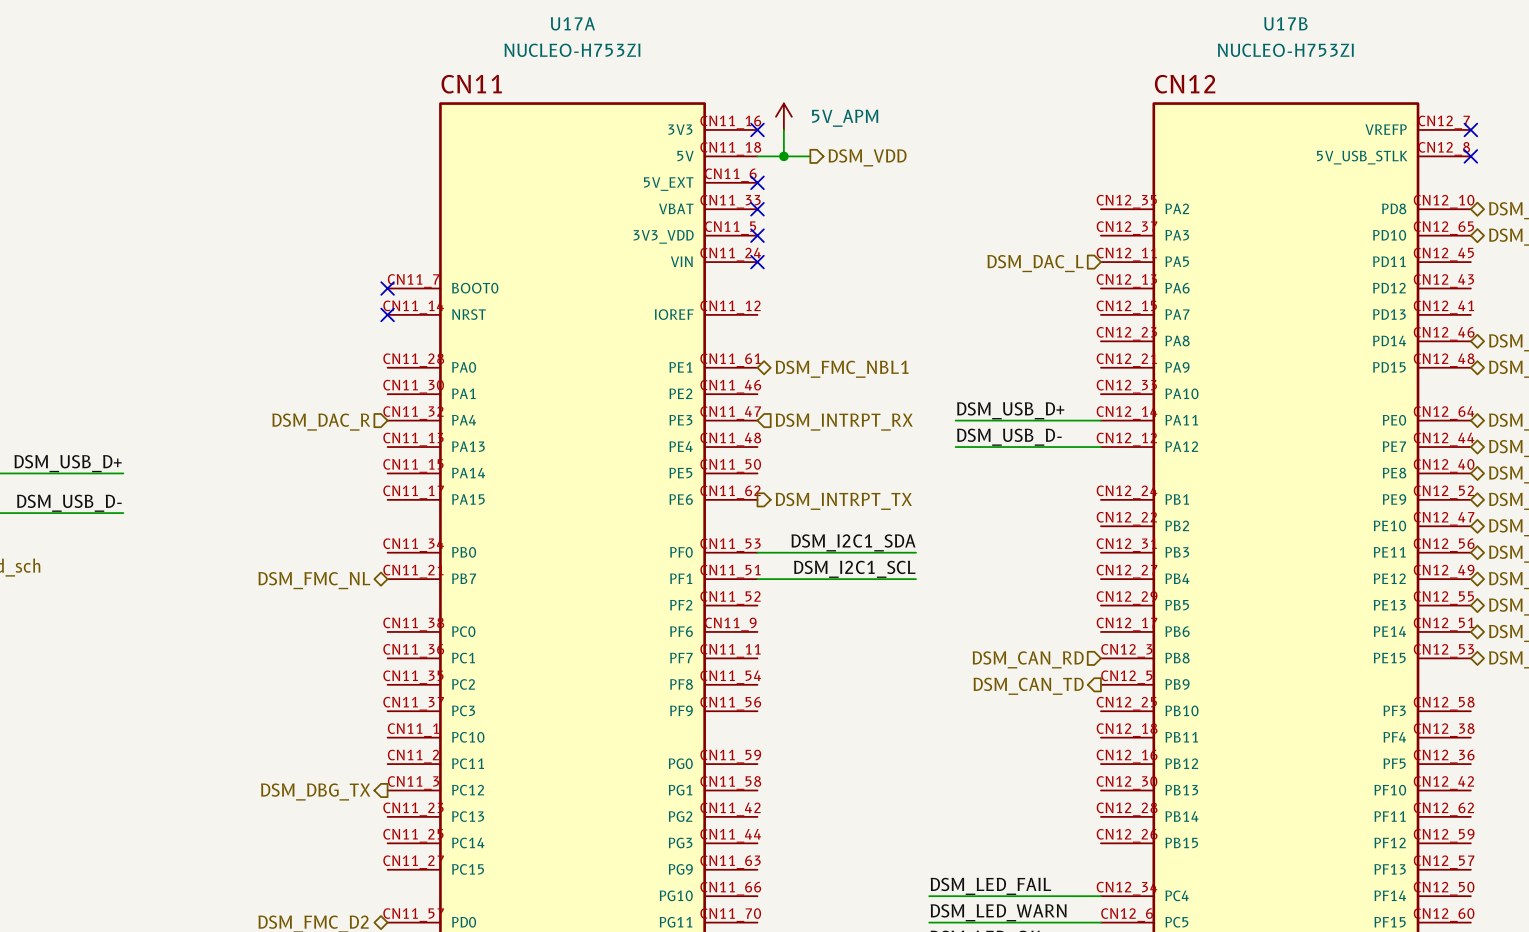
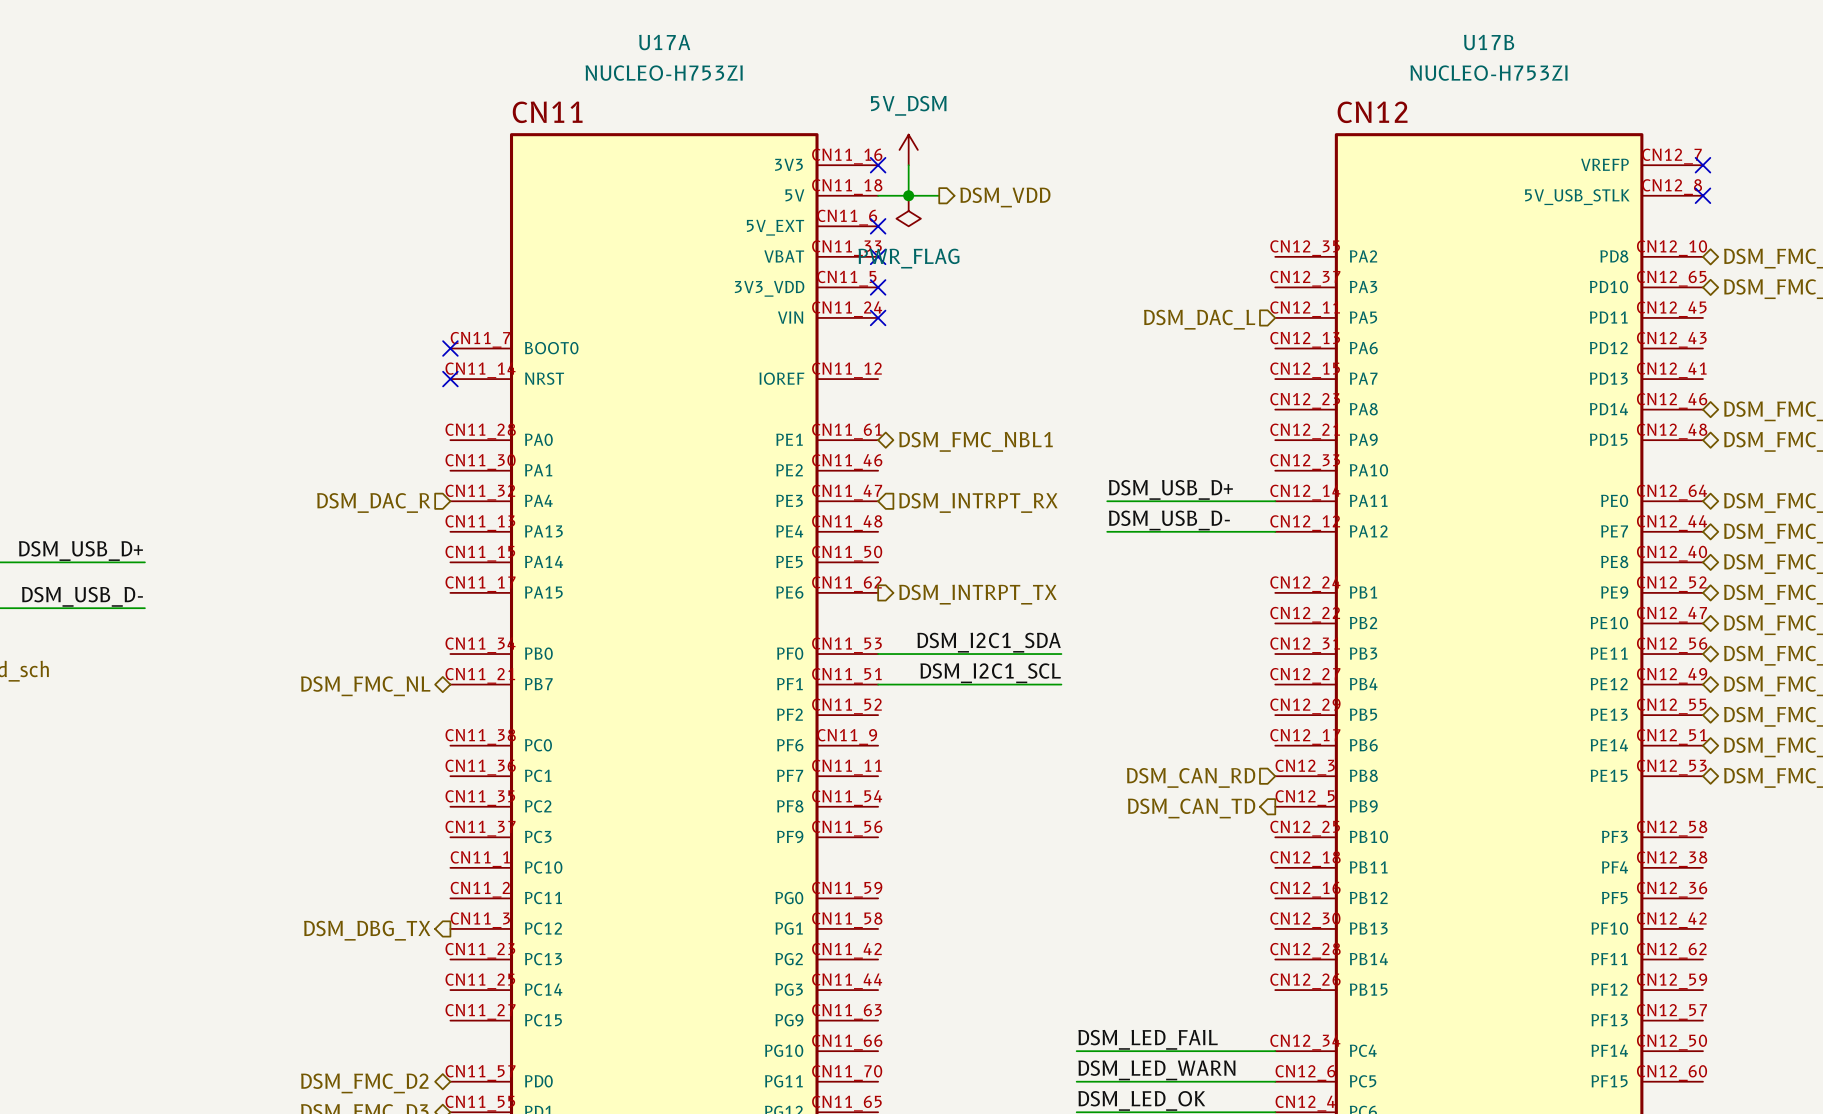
power symbol: 5V_APM (783, 116) -> 5V_DSM (908, 149)
power symbol: none -> PWR_FLAG (908, 211)

